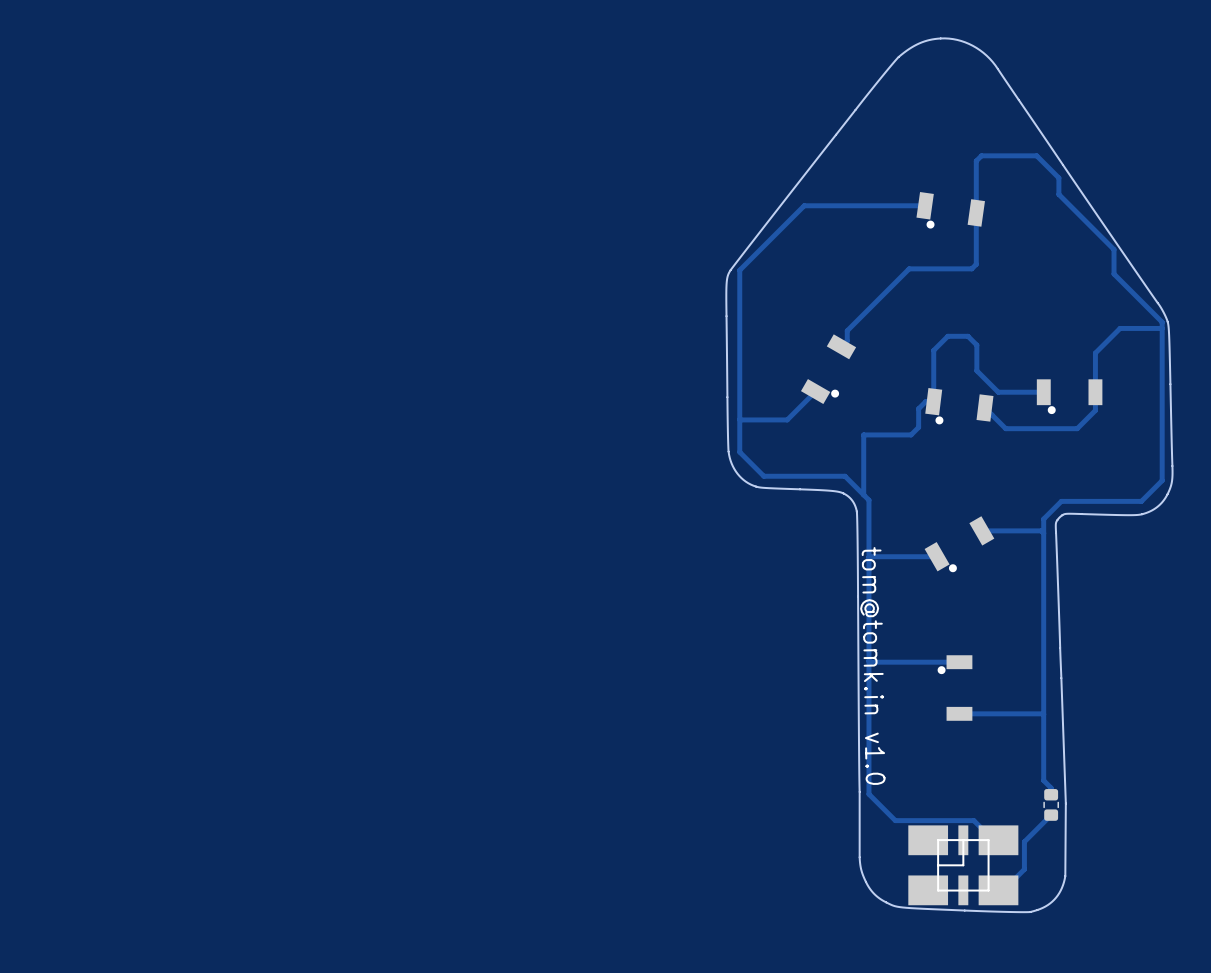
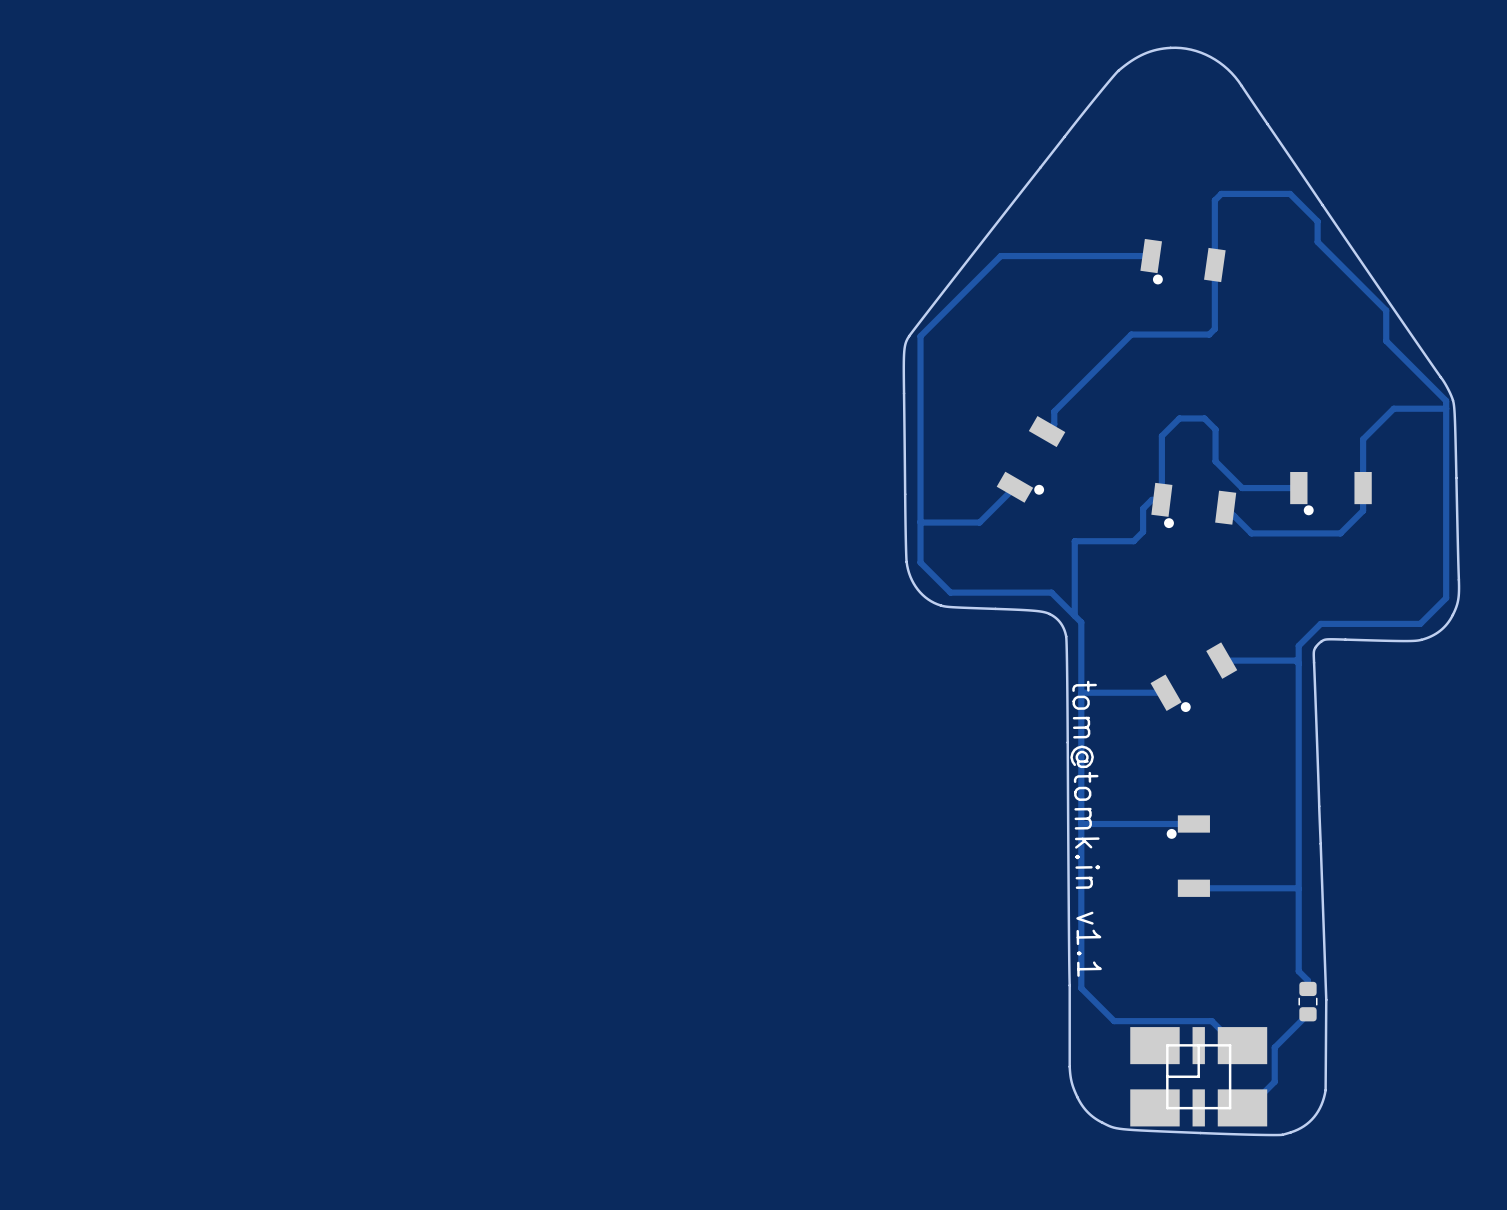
text: tom@tomk.in v1.0 (872, 665) -> tom@tomk.in v1.1 (1086, 828)

